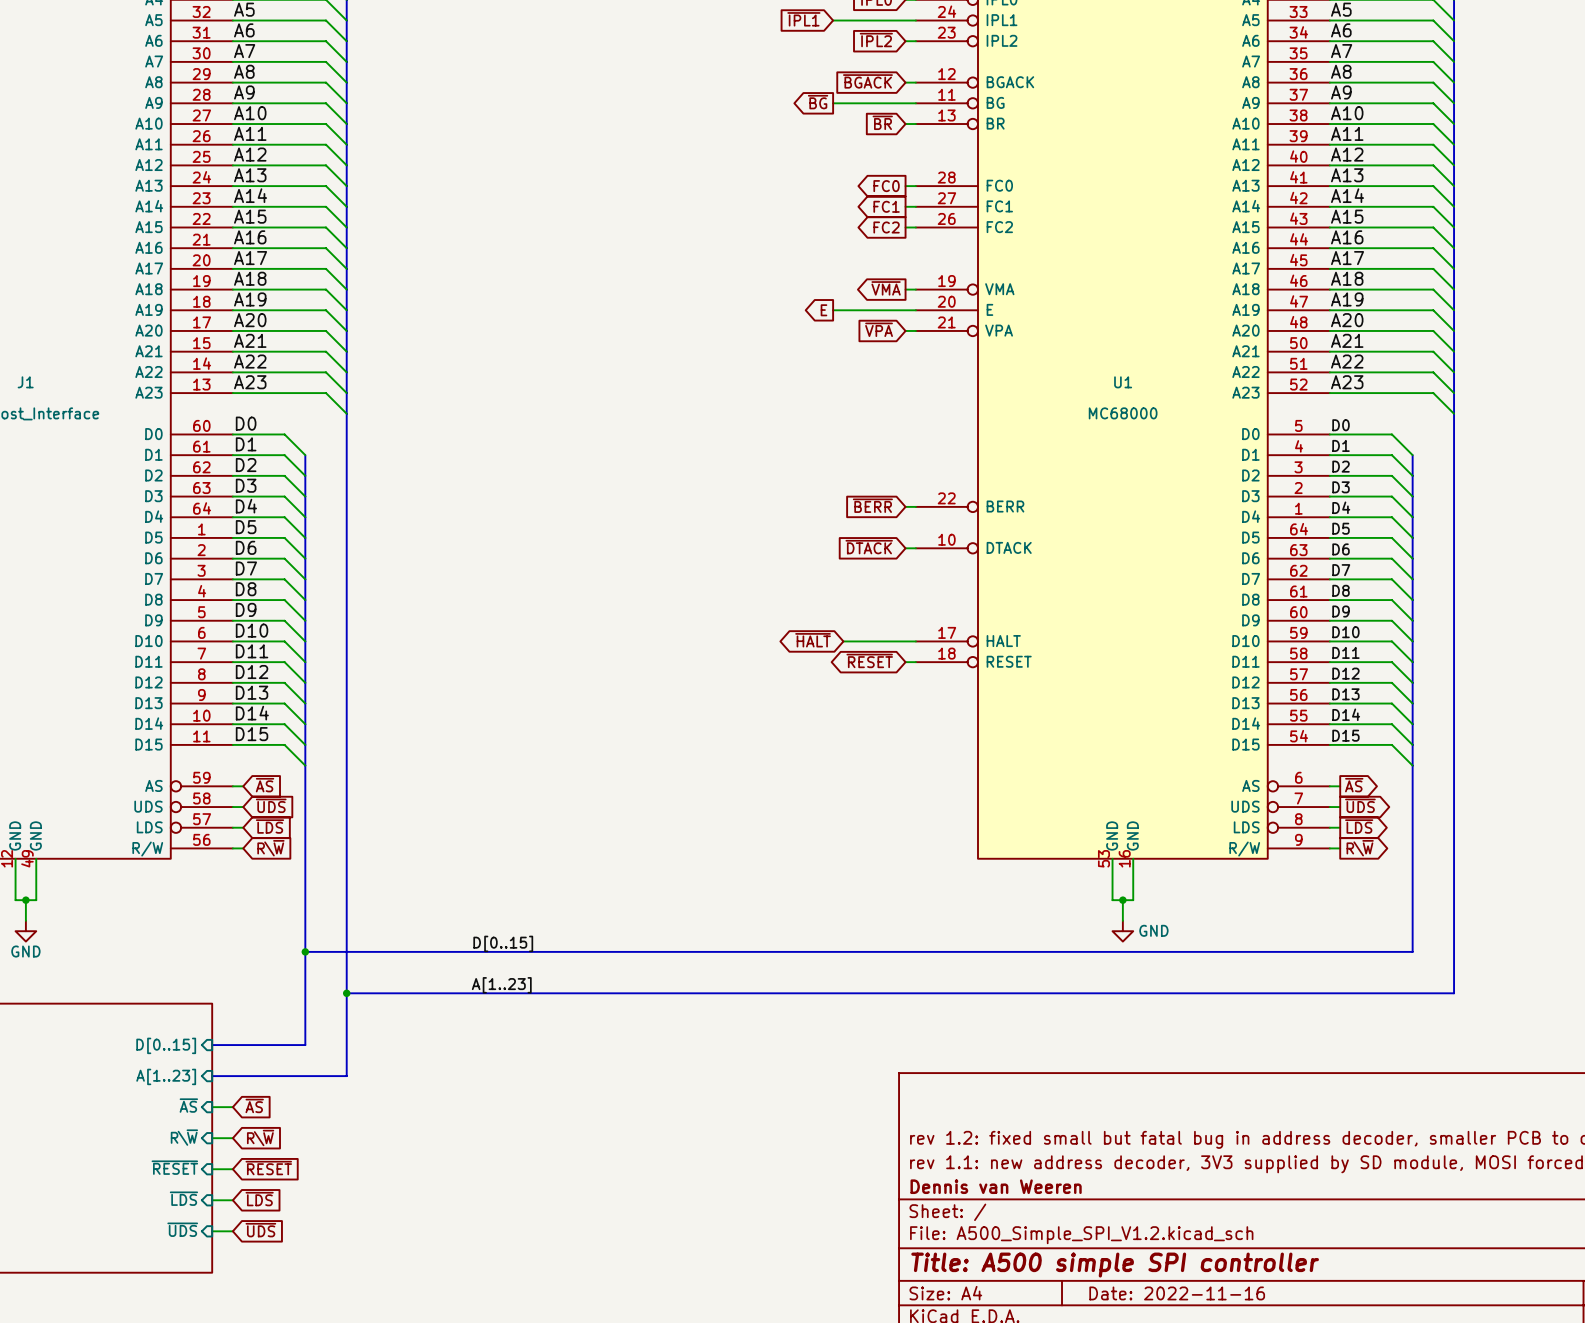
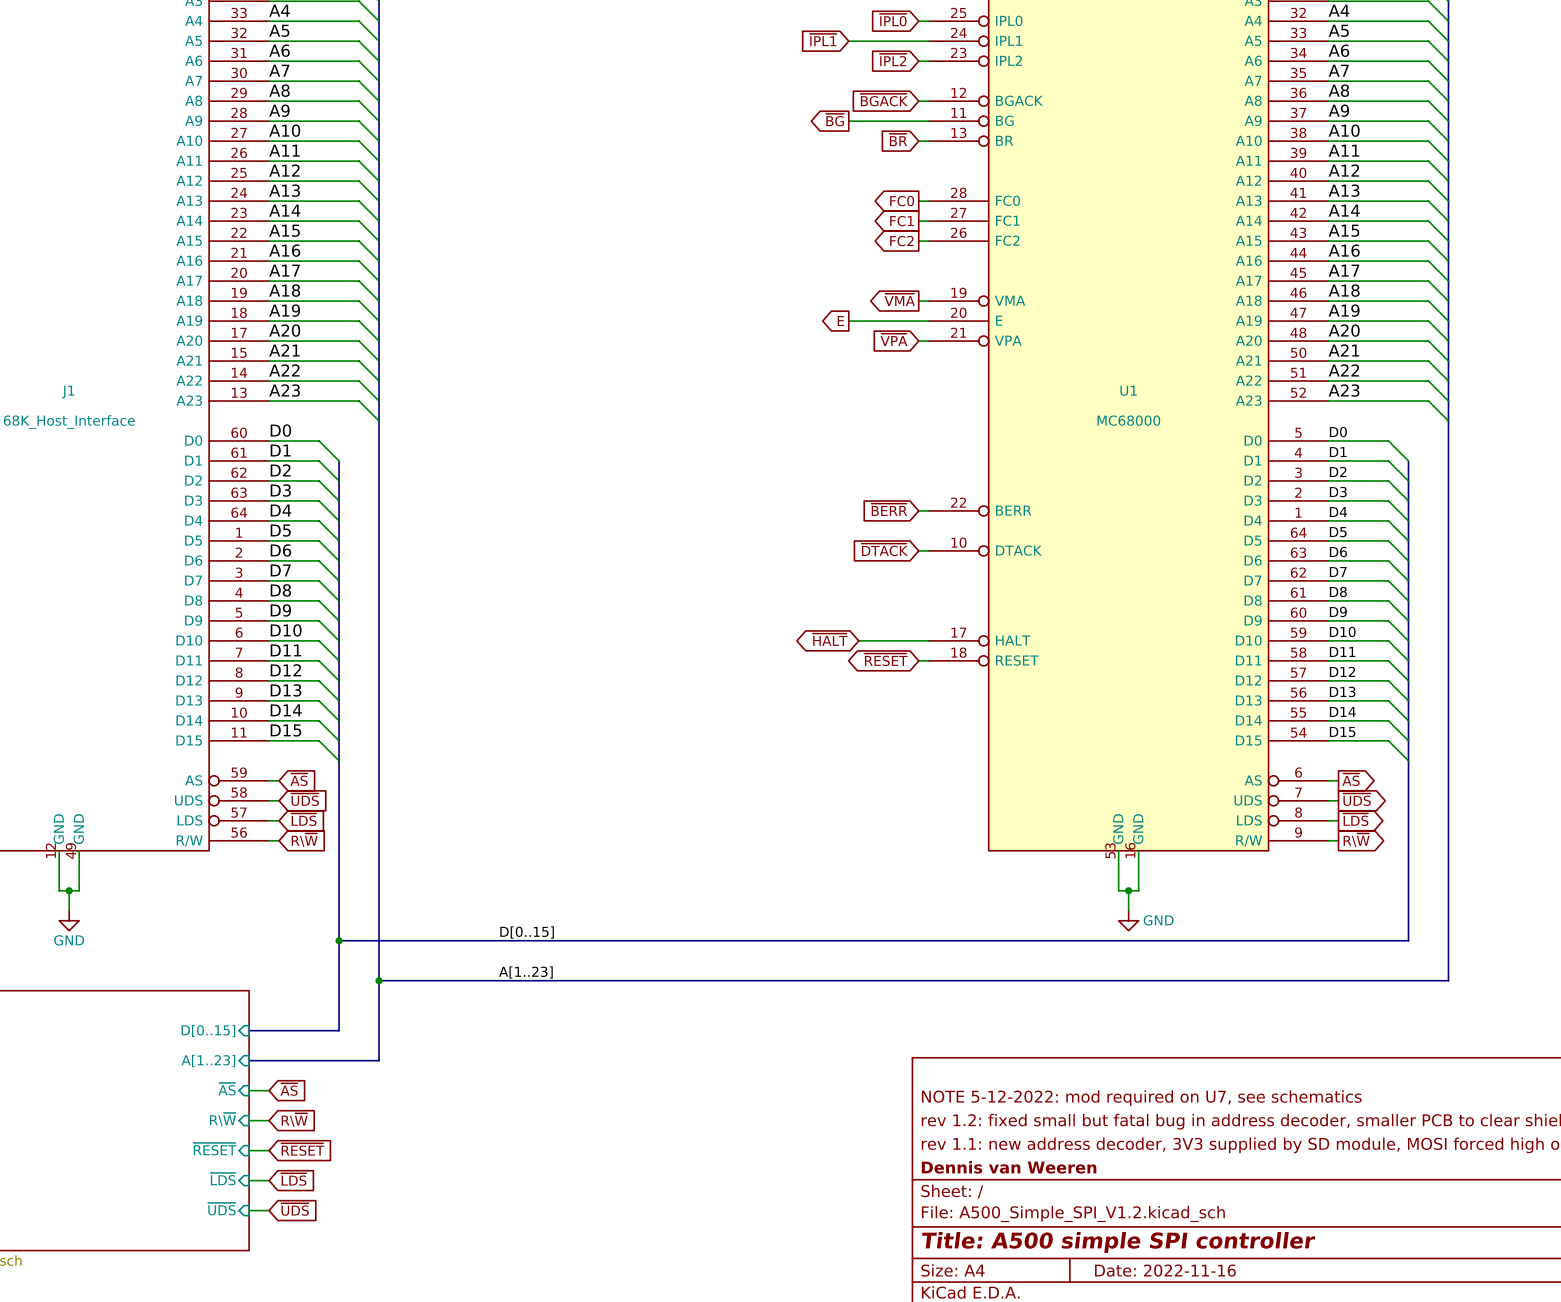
title block: none -> NOTE 5-12-2022: mod required on U7, see schematics (1141, 1098)

